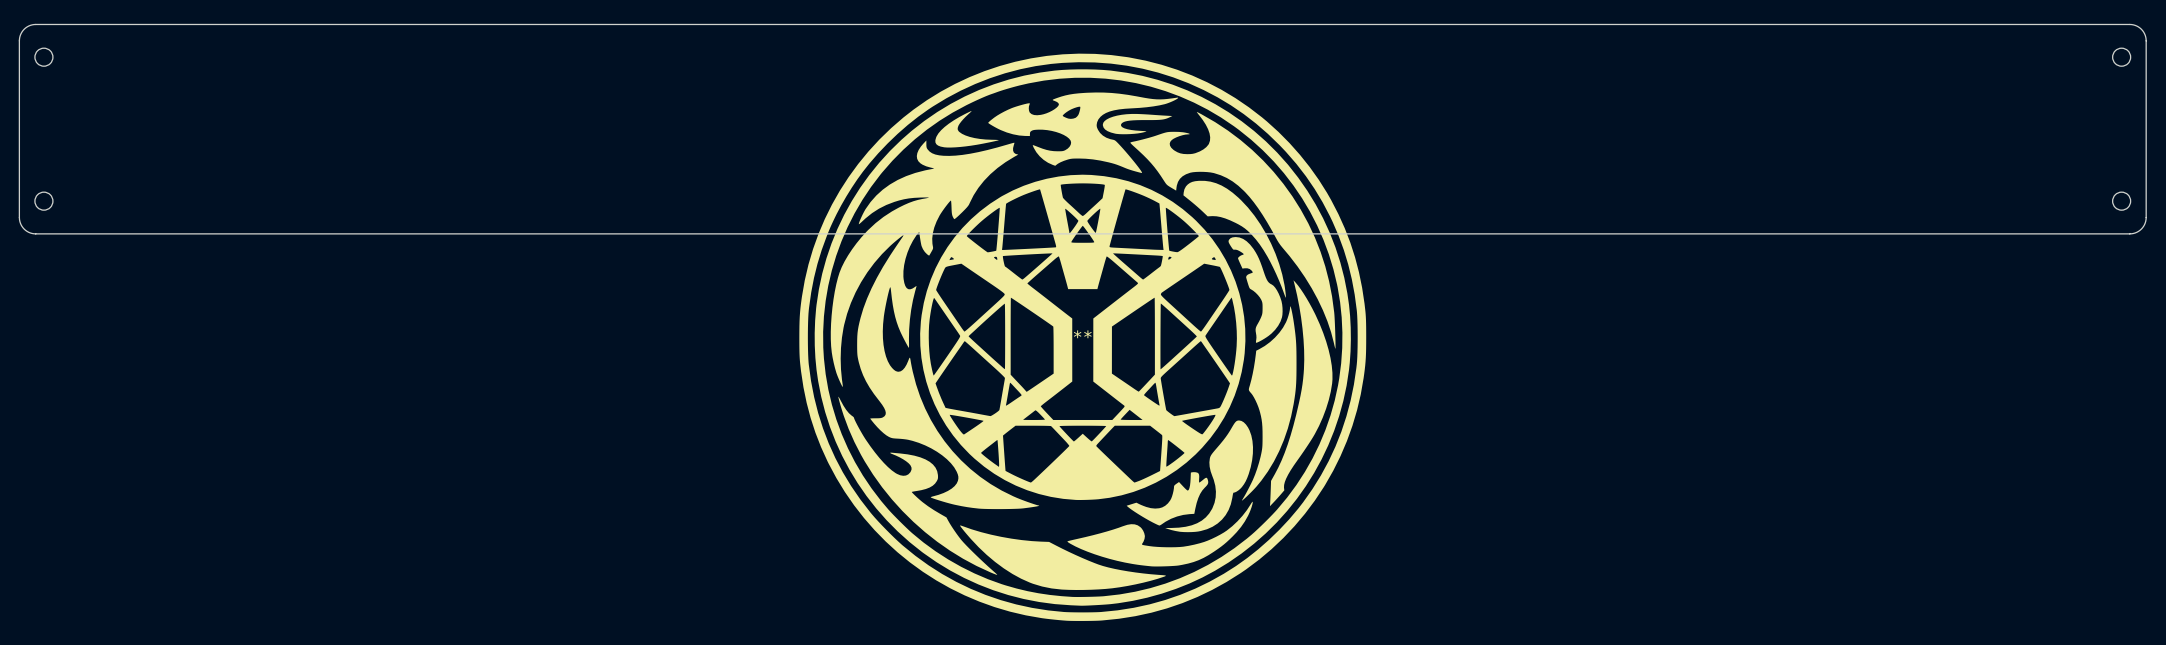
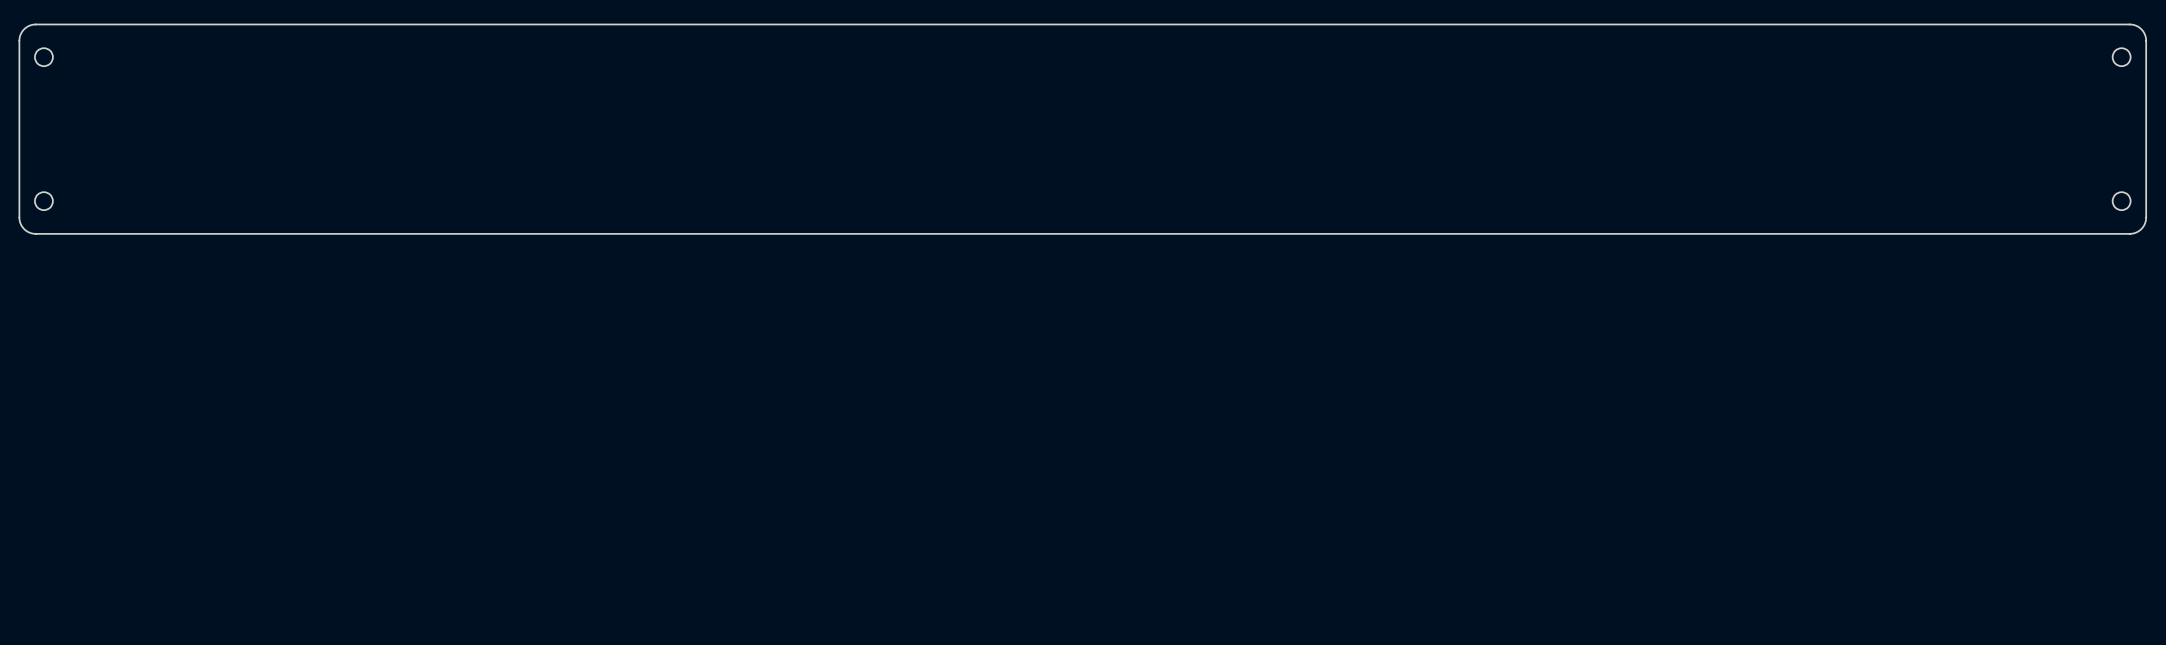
part: (1082, 337) -> none

